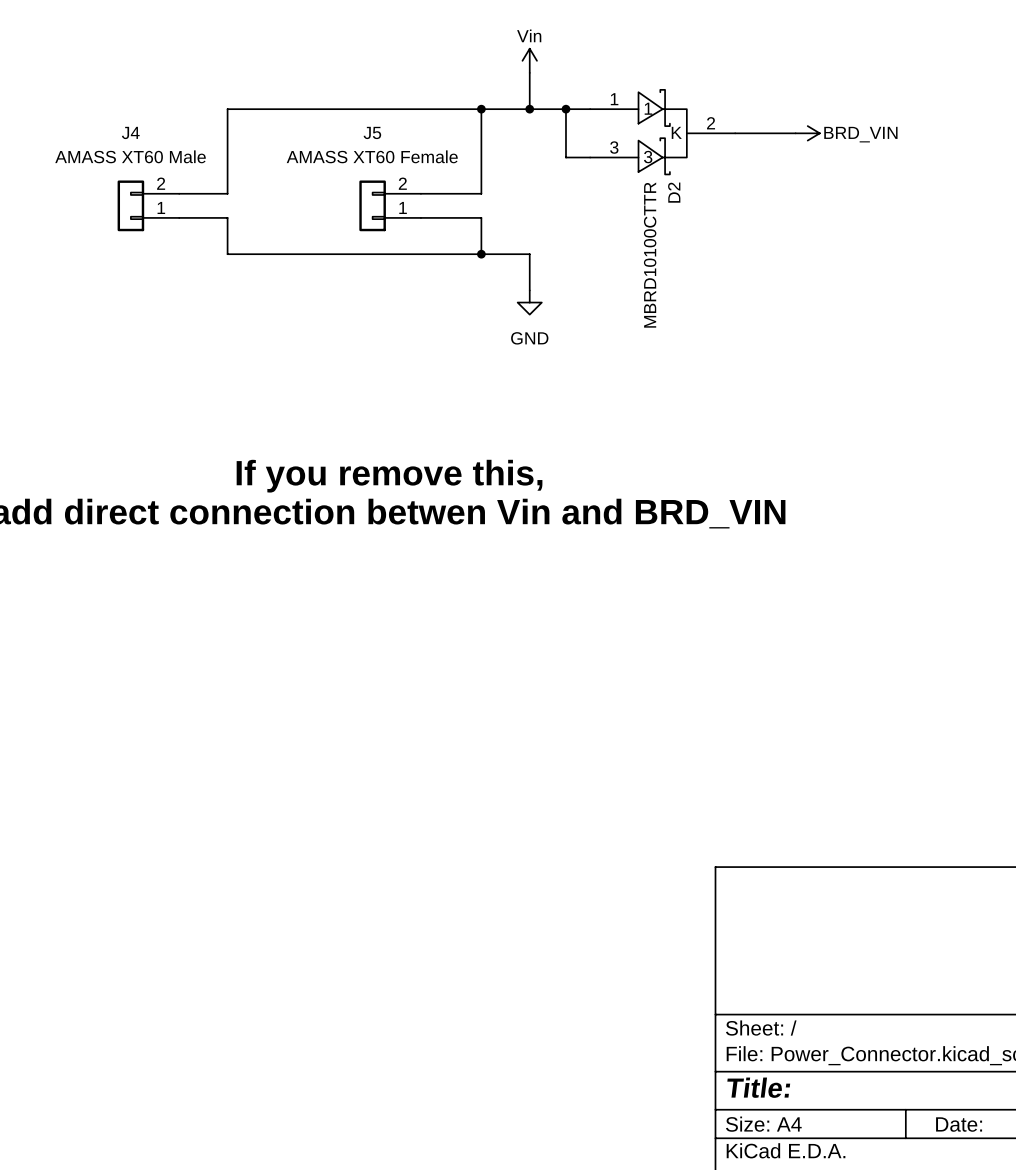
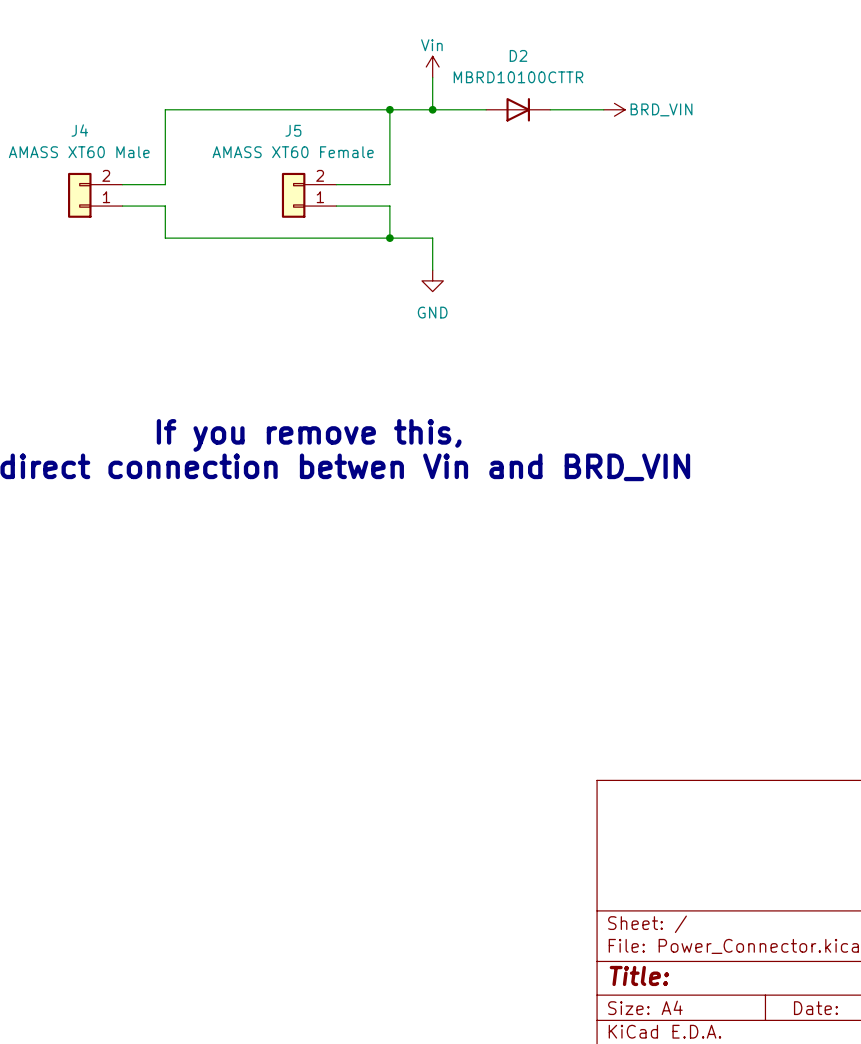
D2 symbol: [590, 89, 736, 175] -> [486, 98, 551, 122]
wire: (565, 109) (565, 157) (590, 157) -> none
junction: (565, 109) -> none
wire: (735, 133) (795, 133) -> (550, 109) (603, 109)
power symbol position: BRD_VIN (807, 133) -> BRD_VIN (614, 109)
D2 name position: D2 (674, 192) -> D2 (518, 55)
D2 value position: MBRD10100CTTR (650, 255) -> MBRD10100CTTR (518, 77)

